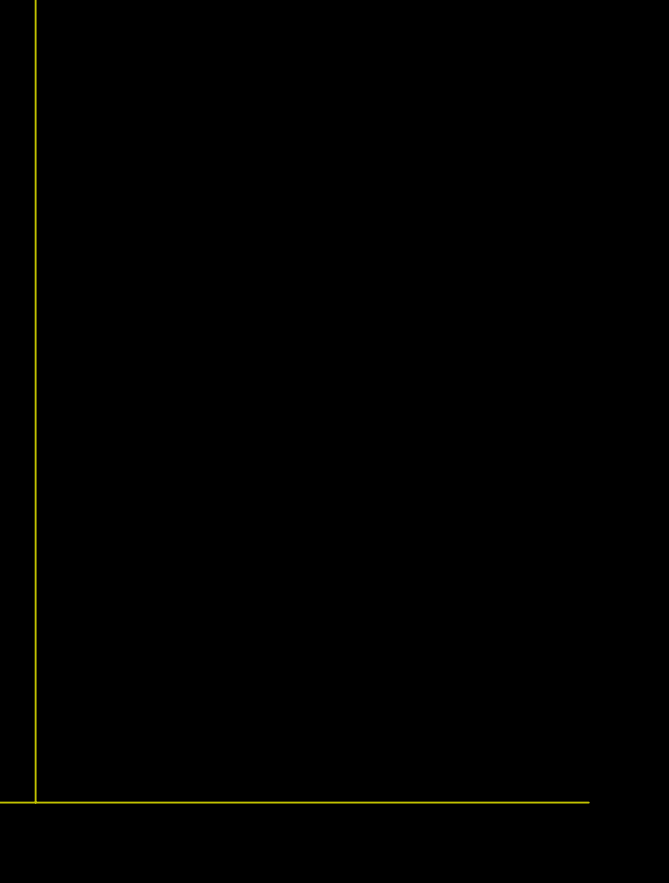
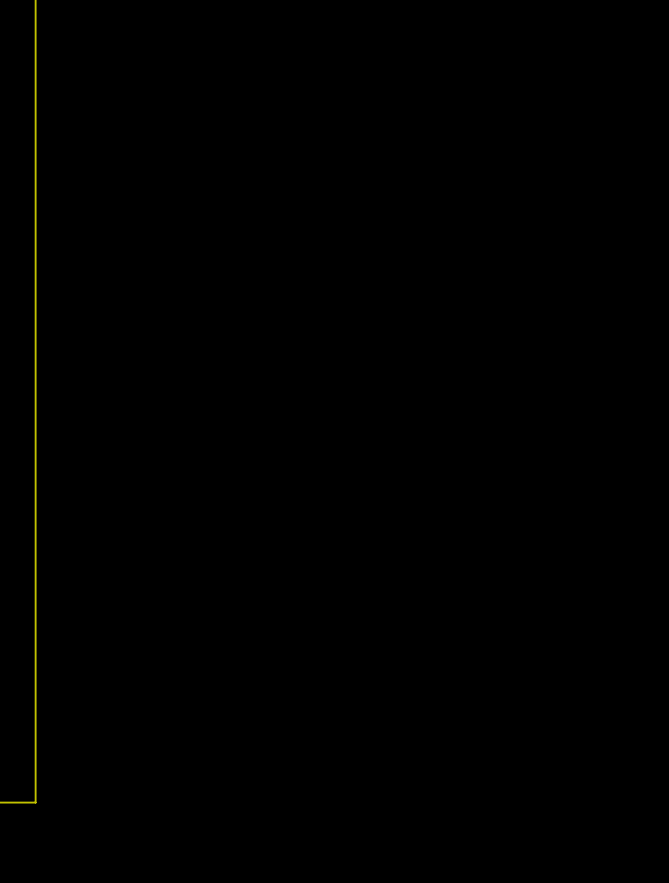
board edge: (35, 802) (588, 802) -> none

